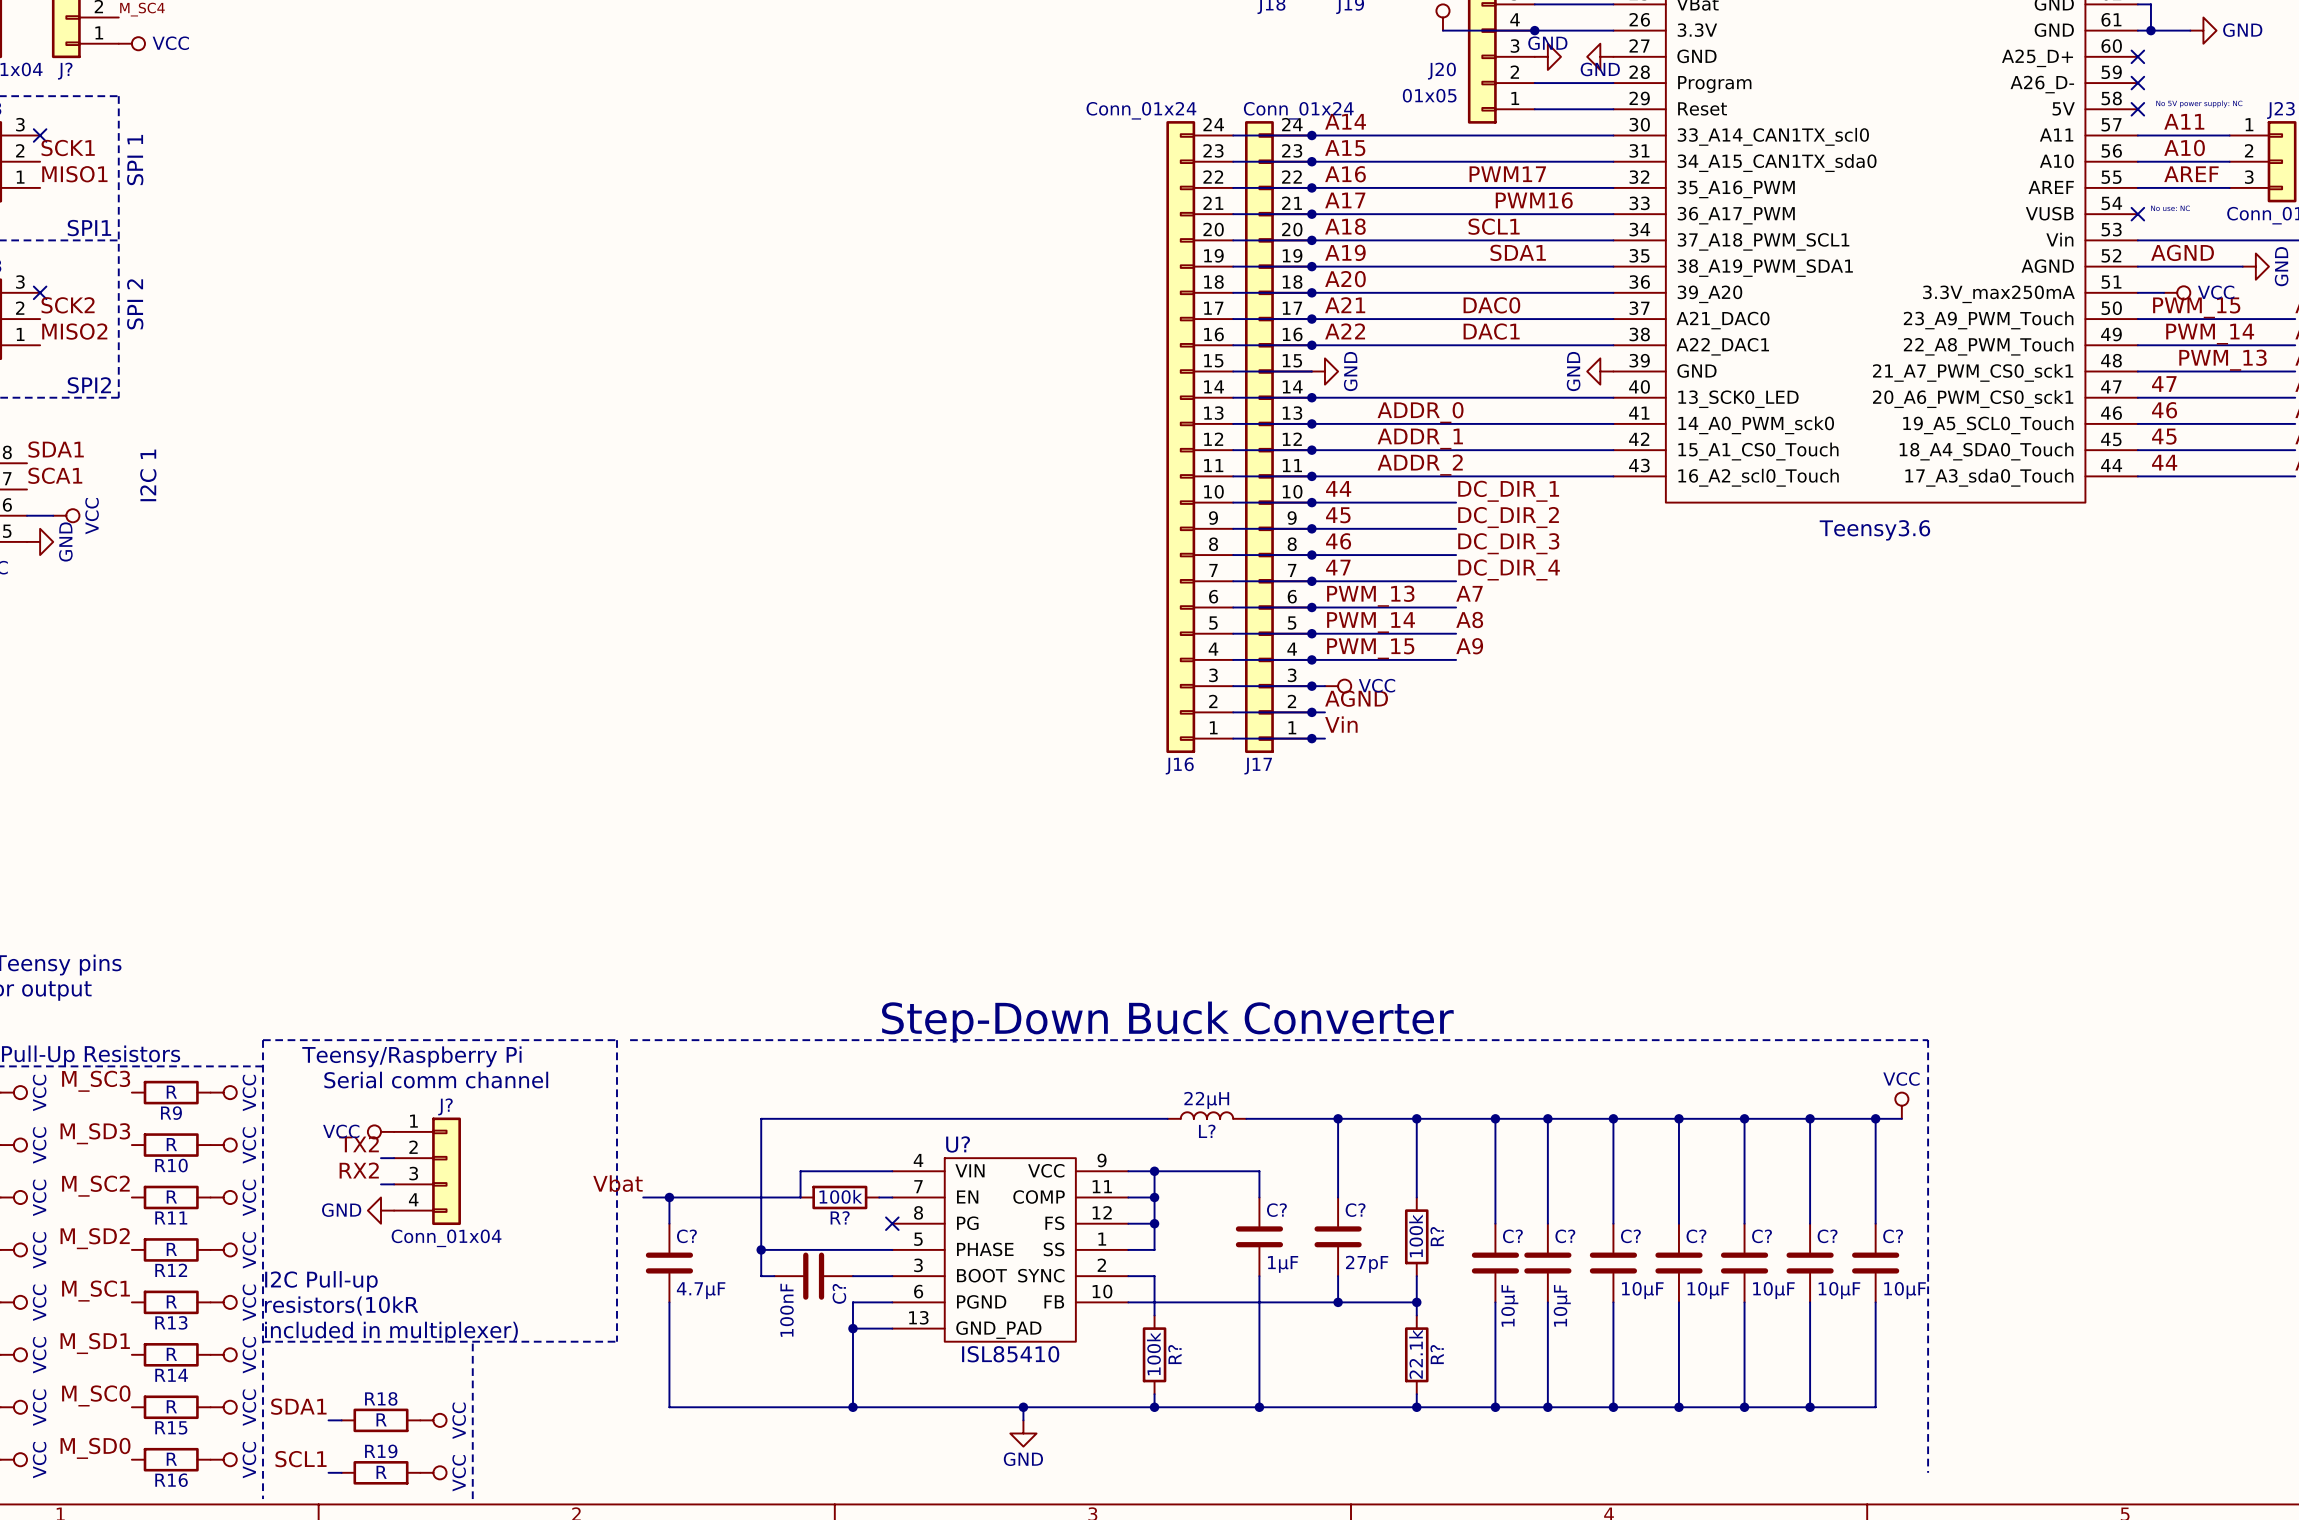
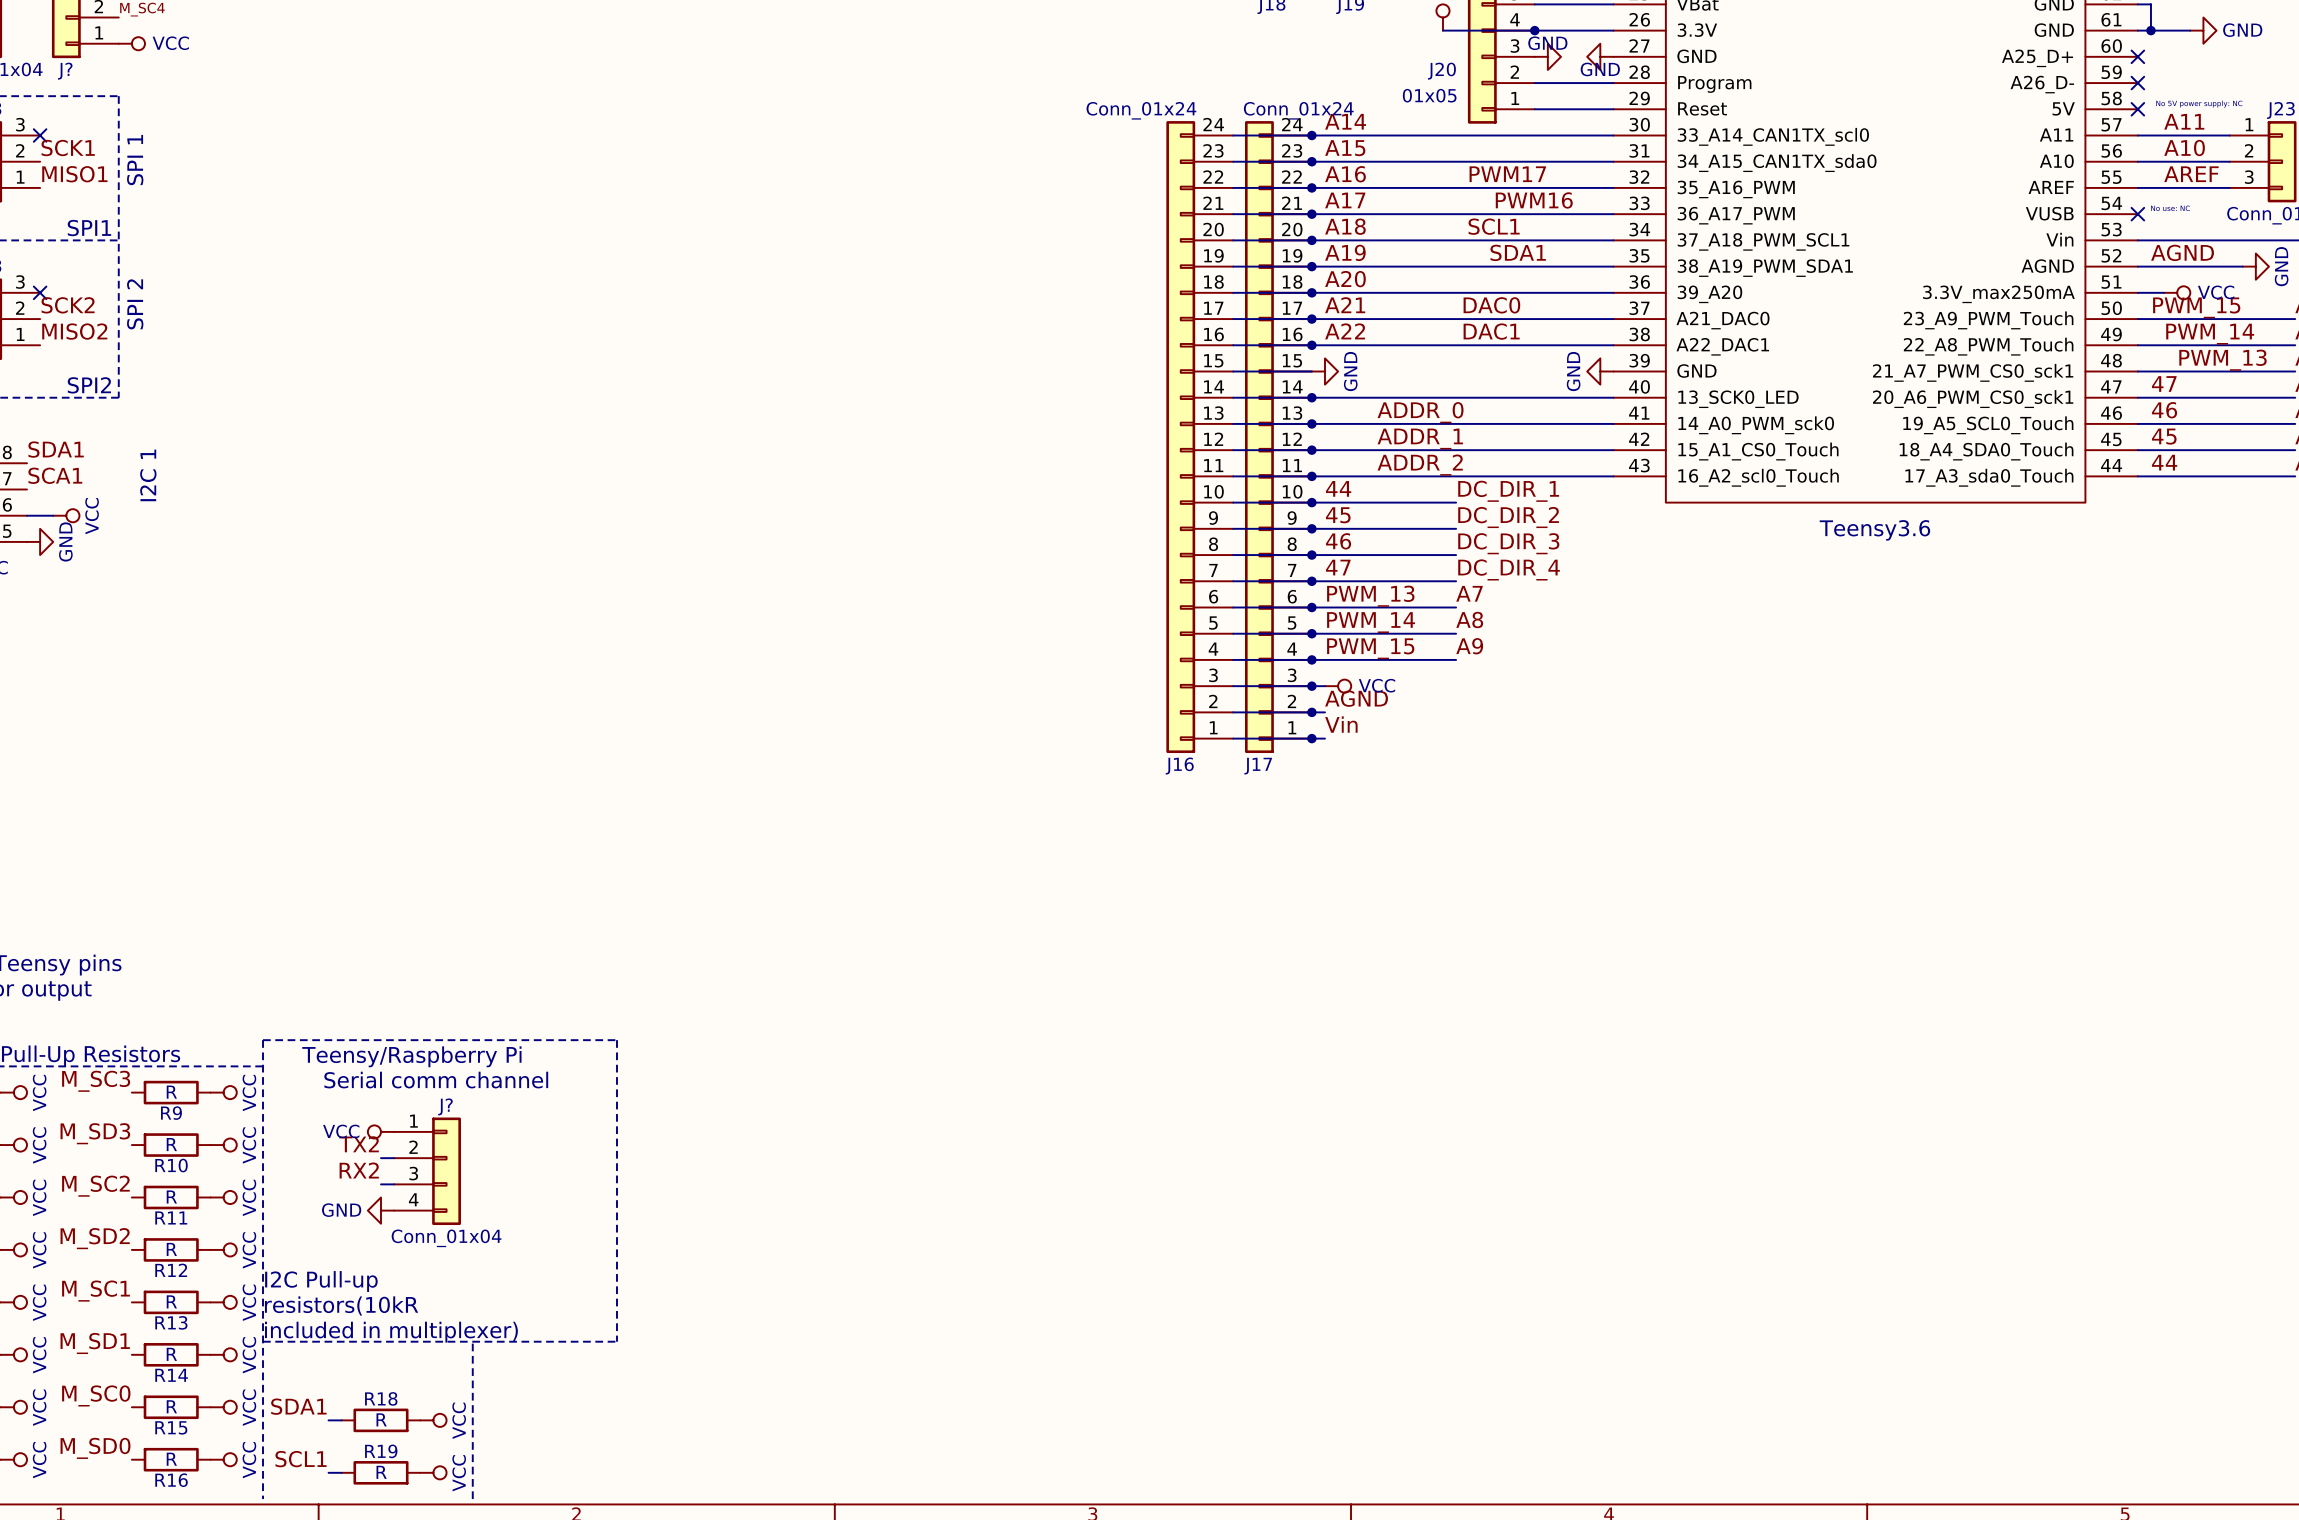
text: Step-Down Buck Converter (1167, 1022) -> none
line: (630, 1040) (1928, 1040) (1928, 1472) -> none
power symbol: VCC (1901, 1105) -> none
L?: 22µH (1206, 1115) -> none
wire: (1167, 1118) (761, 1118) (761, 1276) (774, 1276) -> none
wire: (1246, 1118) (1901, 1118) -> none
wire: (1338, 1118) (1338, 1197) -> none
junction: (1338, 1118) -> none
wire: (1416, 1118) (1416, 1197) -> none
junction: (1416, 1118) -> none
wire: (1495, 1118) (1495, 1223) -> none
junction: (1495, 1118) -> none
wire: (1547, 1118) (1547, 1223) -> none
junction: (1547, 1118) -> none
wire: (1613, 1118) (1613, 1223) -> none
junction: (1613, 1118) -> none
wire: (1678, 1118) (1678, 1223) -> none
junction: (1678, 1118) -> none
wire: (1744, 1118) (1744, 1223) -> none
junction: (1744, 1118) -> none
wire: (1810, 1118) (1810, 1223) -> none
junction: (1810, 1118) -> none
wire: (1875, 1118) (1875, 1223) -> none
junction: (1875, 1118) -> none
wire: (892, 1171) (800, 1171) (800, 1197) (643, 1197) -> none
wire: (1128, 1171) (1259, 1171) (1259, 1197) -> none
wire: (1154, 1171) (1154, 1249) (1128, 1249) -> none
junction: (1154, 1171) -> none
label: Vbat (617, 1183) -> none
wire: (669, 1197) (669, 1223) -> none
junction: (669, 1197) -> none
R?: 100k (839, 1197) -> none
wire: (879, 1197) (892, 1197) -> none
wire: (1128, 1197) (1154, 1197) -> none
junction: (1154, 1197) -> none
no-connect mark: (892, 1223) -> none
wire: (1128, 1223) (1154, 1223) -> none
junction: (1154, 1223) -> none
C?: 1µF (1259, 1236) -> none
C?: 27pF (1338, 1236) -> none
R?: 100k (1416, 1236) -> none
wire: (761, 1249) (892, 1249) -> none
junction: (761, 1249) -> none
U?: ISL85410 (1010, 1249) -> none
C?: 4.7µF (669, 1263) -> none
C?: 10µF (1495, 1263) -> none
C?: 10µF (1547, 1263) -> none
C?: 10µF (1613, 1263) -> none
C?: 10µF (1678, 1263) -> none
C?: 10µF (1744, 1263) -> none
C?: 10µF (1810, 1263) -> none
C?: 10µF (1875, 1263) -> none
C?: 100nF (813, 1276) -> none
wire: (852, 1276) (892, 1276) -> none
wire: (1128, 1276) (1154, 1276) (1154, 1315) -> none
wire: (1259, 1276) (1259, 1407) -> none
wire: (1338, 1276) (1338, 1302) -> none
wire: (1416, 1276) (1416, 1315) -> none
wire: (669, 1302) (669, 1407) (1875, 1407) (1875, 1302) -> none
wire: (892, 1302) (852, 1302) (852, 1407) -> none
wire: (1128, 1302) (1416, 1302) -> none
junction: (1338, 1302) -> none
junction: (1416, 1302) -> none
wire: (1495, 1302) (1495, 1407) -> none
wire: (1547, 1302) (1547, 1407) -> none
wire: (1613, 1302) (1613, 1407) -> none
wire: (1678, 1302) (1678, 1407) -> none
wire: (1744, 1302) (1744, 1407) -> none
wire: (1810, 1302) (1810, 1407) -> none
wire: (852, 1328) (892, 1328) -> none
junction: (852, 1328) -> none
R?: 100k (1154, 1354) -> none
R?: 22.1k (1416, 1354) -> none
wire: (1154, 1394) (1154, 1407) -> none
wire: (1416, 1394) (1416, 1407) -> none
junction: (852, 1407) -> none
wire: (1023, 1407) (1023, 1420) -> none
junction: (1023, 1407) -> none
junction: (1154, 1407) -> none
junction: (1259, 1407) -> none
junction: (1416, 1407) -> none
junction: (1495, 1407) -> none
junction: (1547, 1407) -> none
junction: (1613, 1407) -> none
junction: (1678, 1407) -> none
junction: (1744, 1407) -> none
junction: (1810, 1407) -> none
power symbol: GND (1023, 1433) -> none

